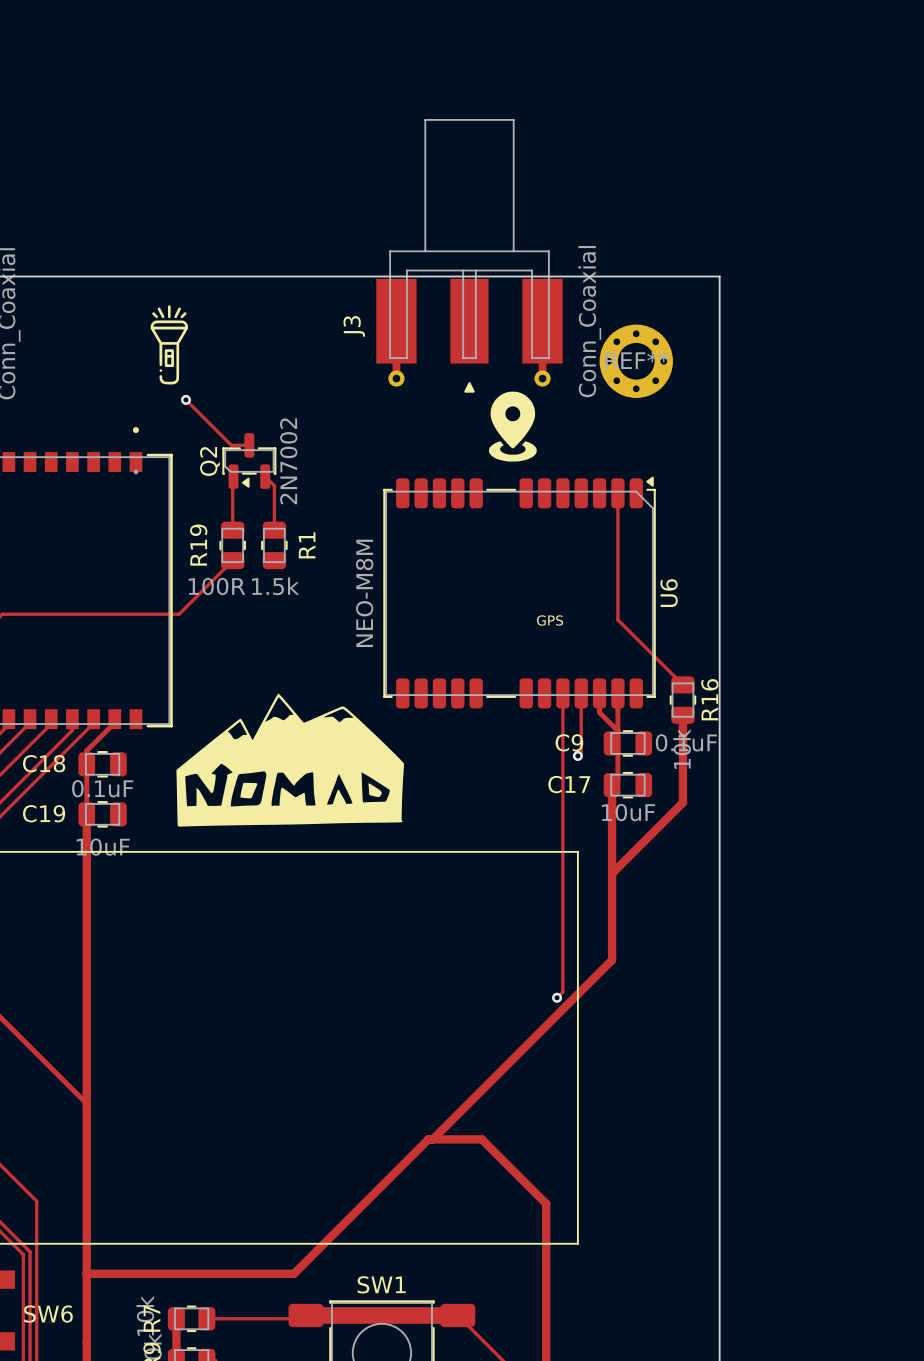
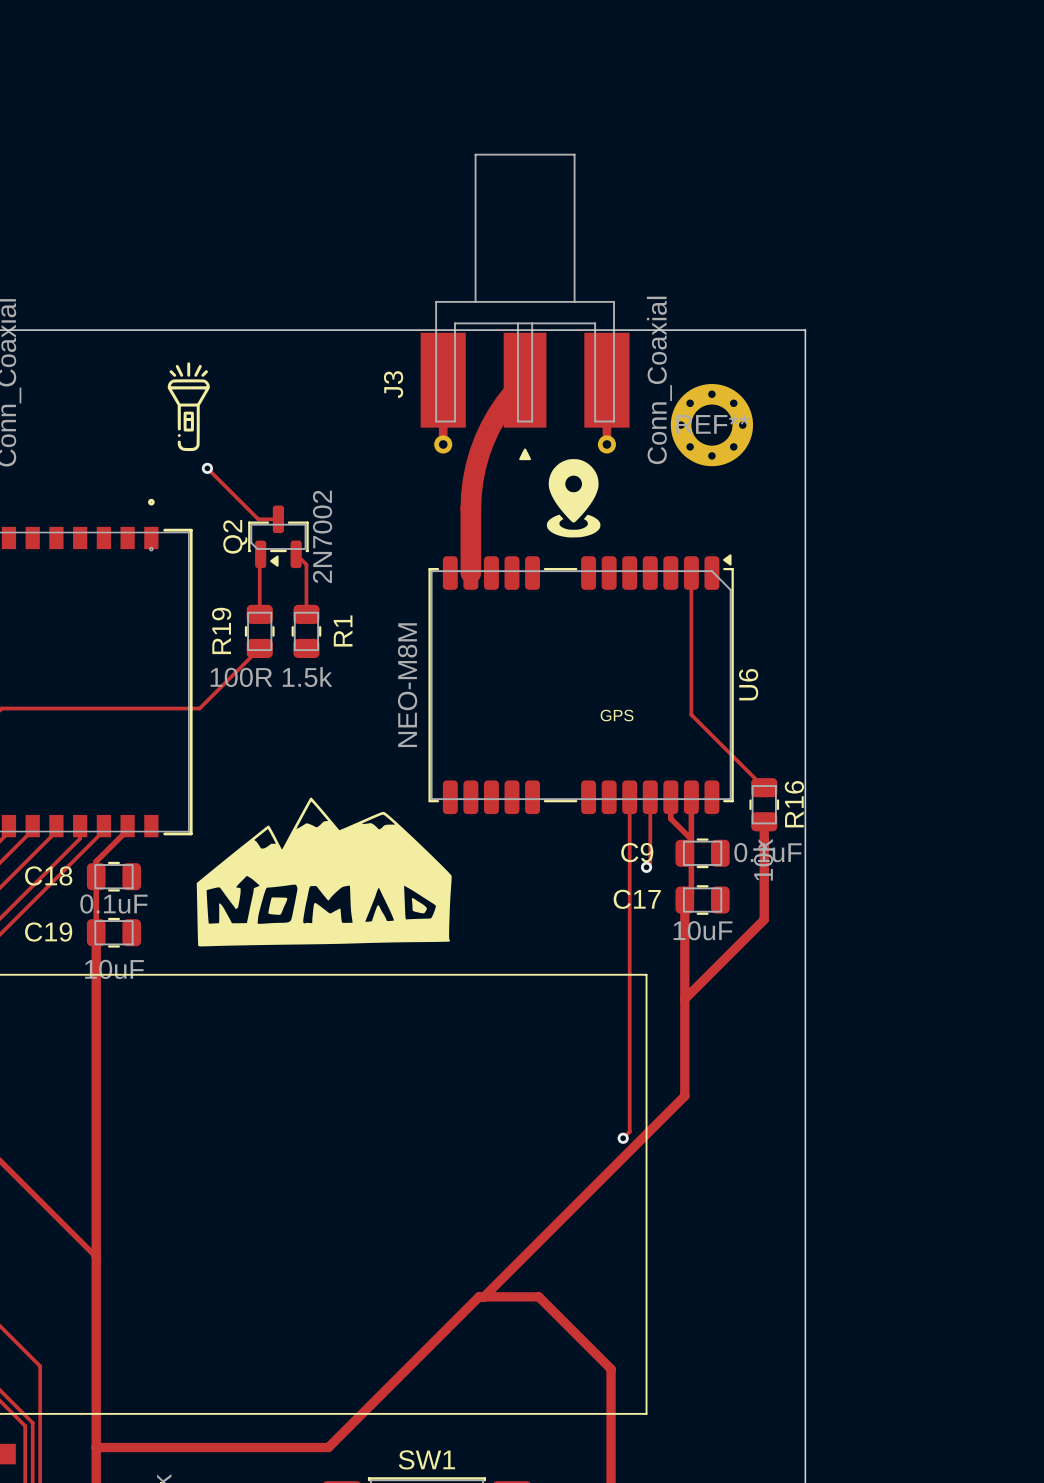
track: none -> (525, 406) (525, 380) (497, 415) (479, 453) (471, 494) (470, 573)

